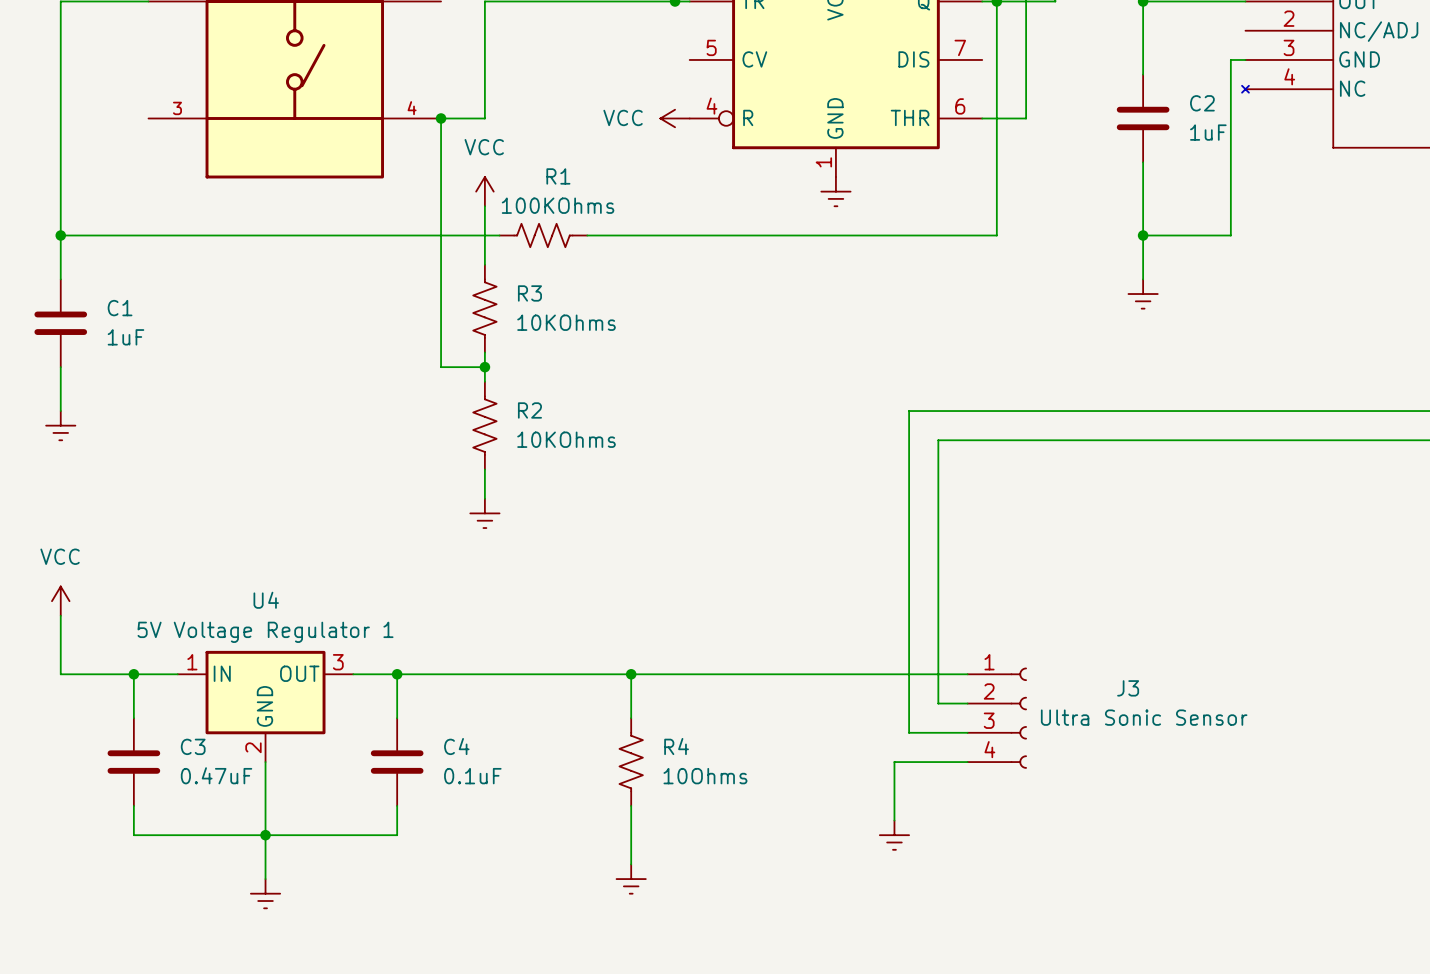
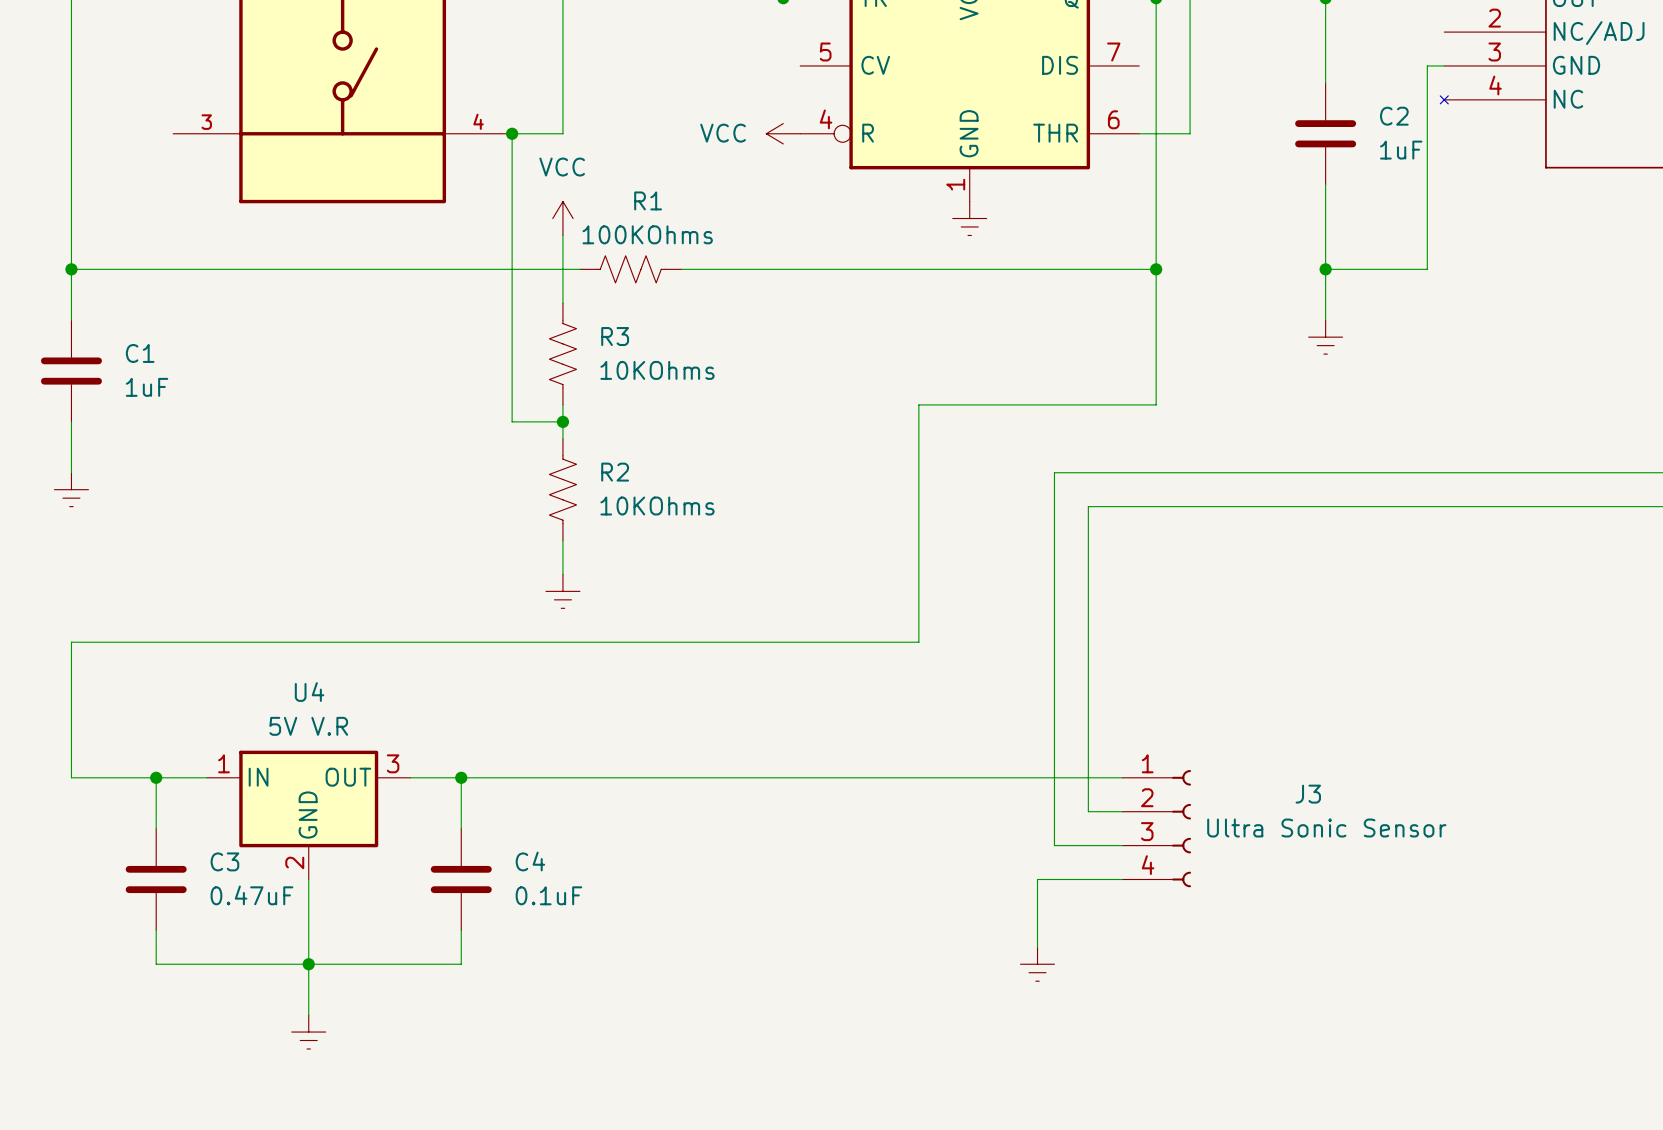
wire: none -> (1156, 269) (1156, 404) (918, 404) (918, 642) (71, 642) (71, 710)
junction: none -> (1156, 269)
power symbol: VCC (60, 601) -> none
U4 value: 5V Voltage Regulator 1 (265, 632) -> 5V V.R (308, 726)
wire: (631, 674) (631, 718) -> none
junction: (631, 674) -> none
R4: 10Ohms (631, 762) -> none
wire: (631, 805) (631, 864) -> none
power symbol: (631, 879) -> none

